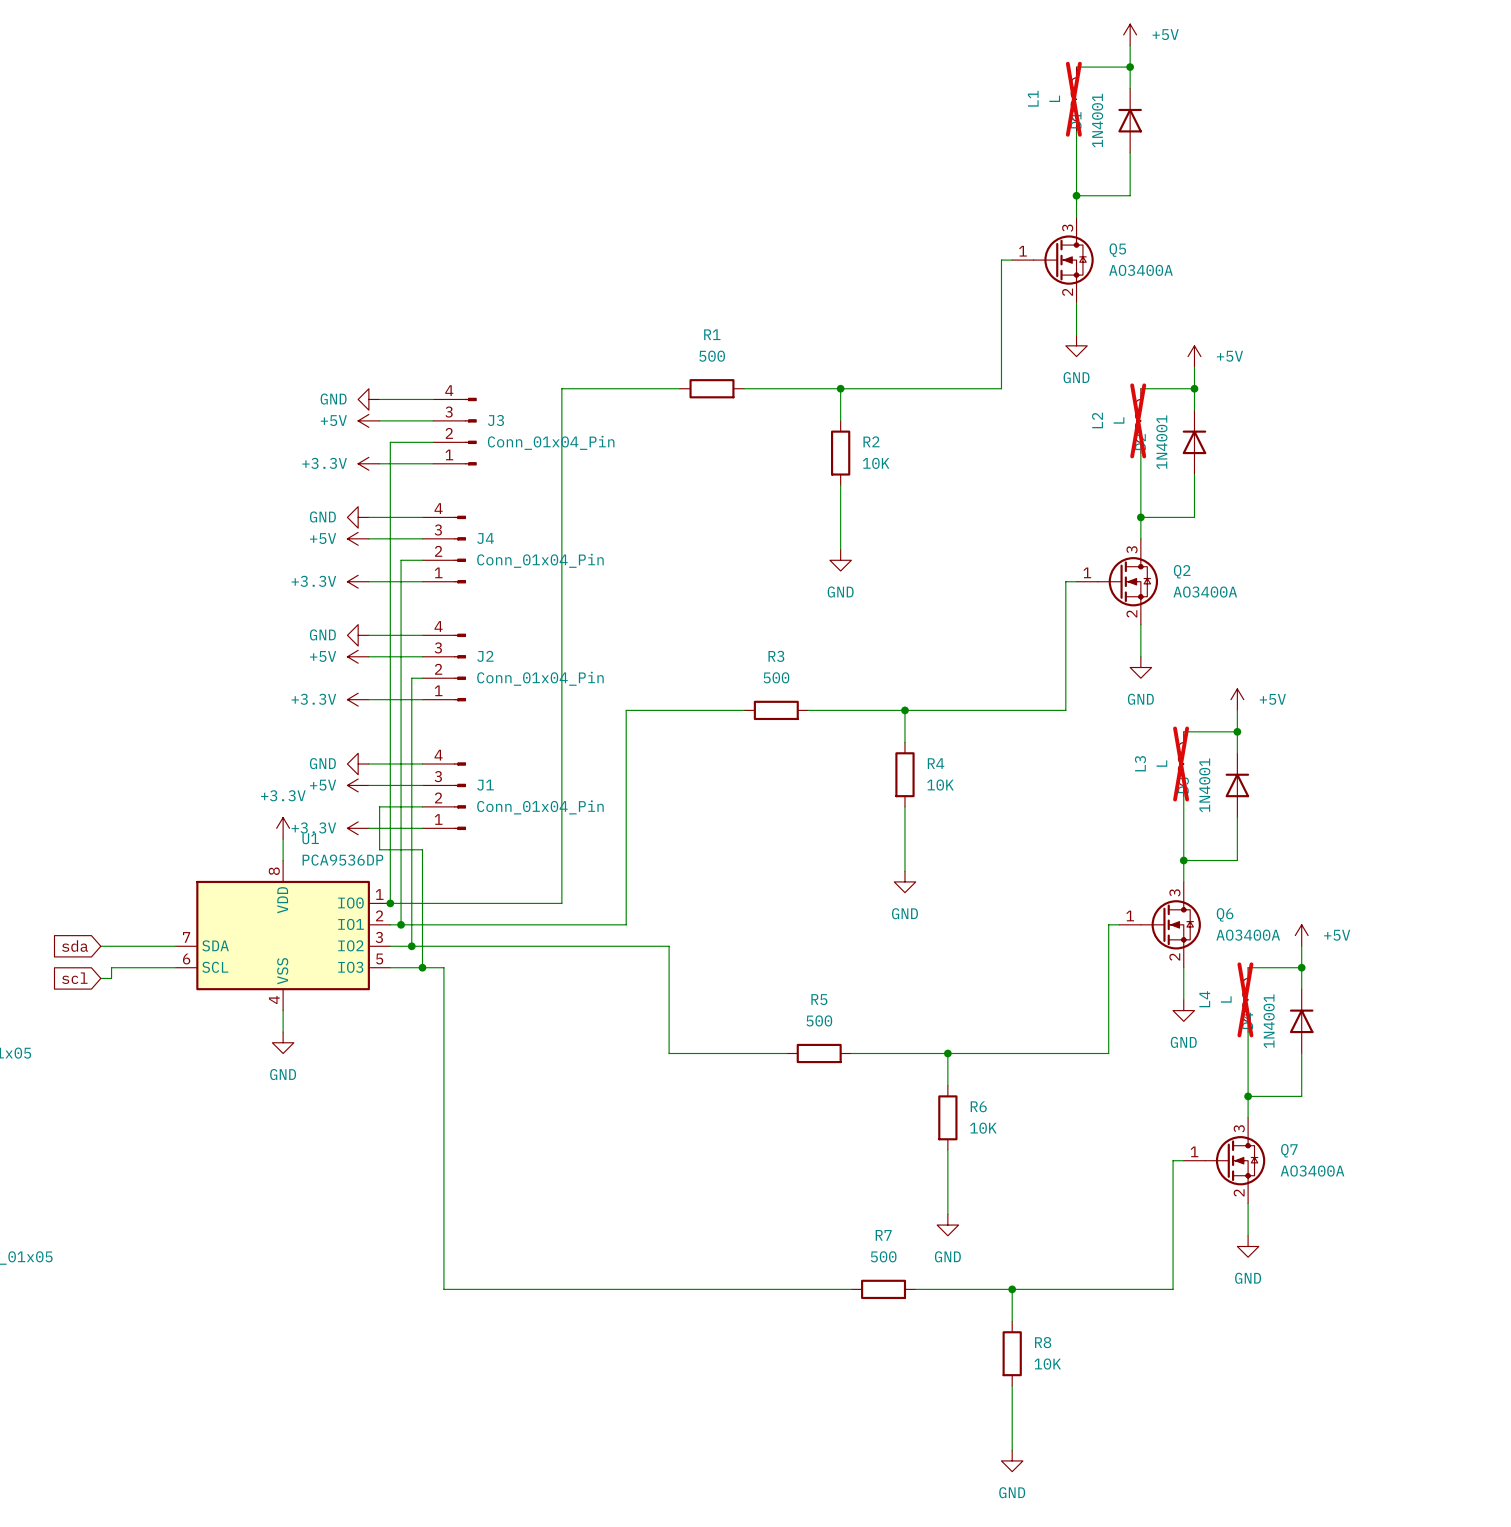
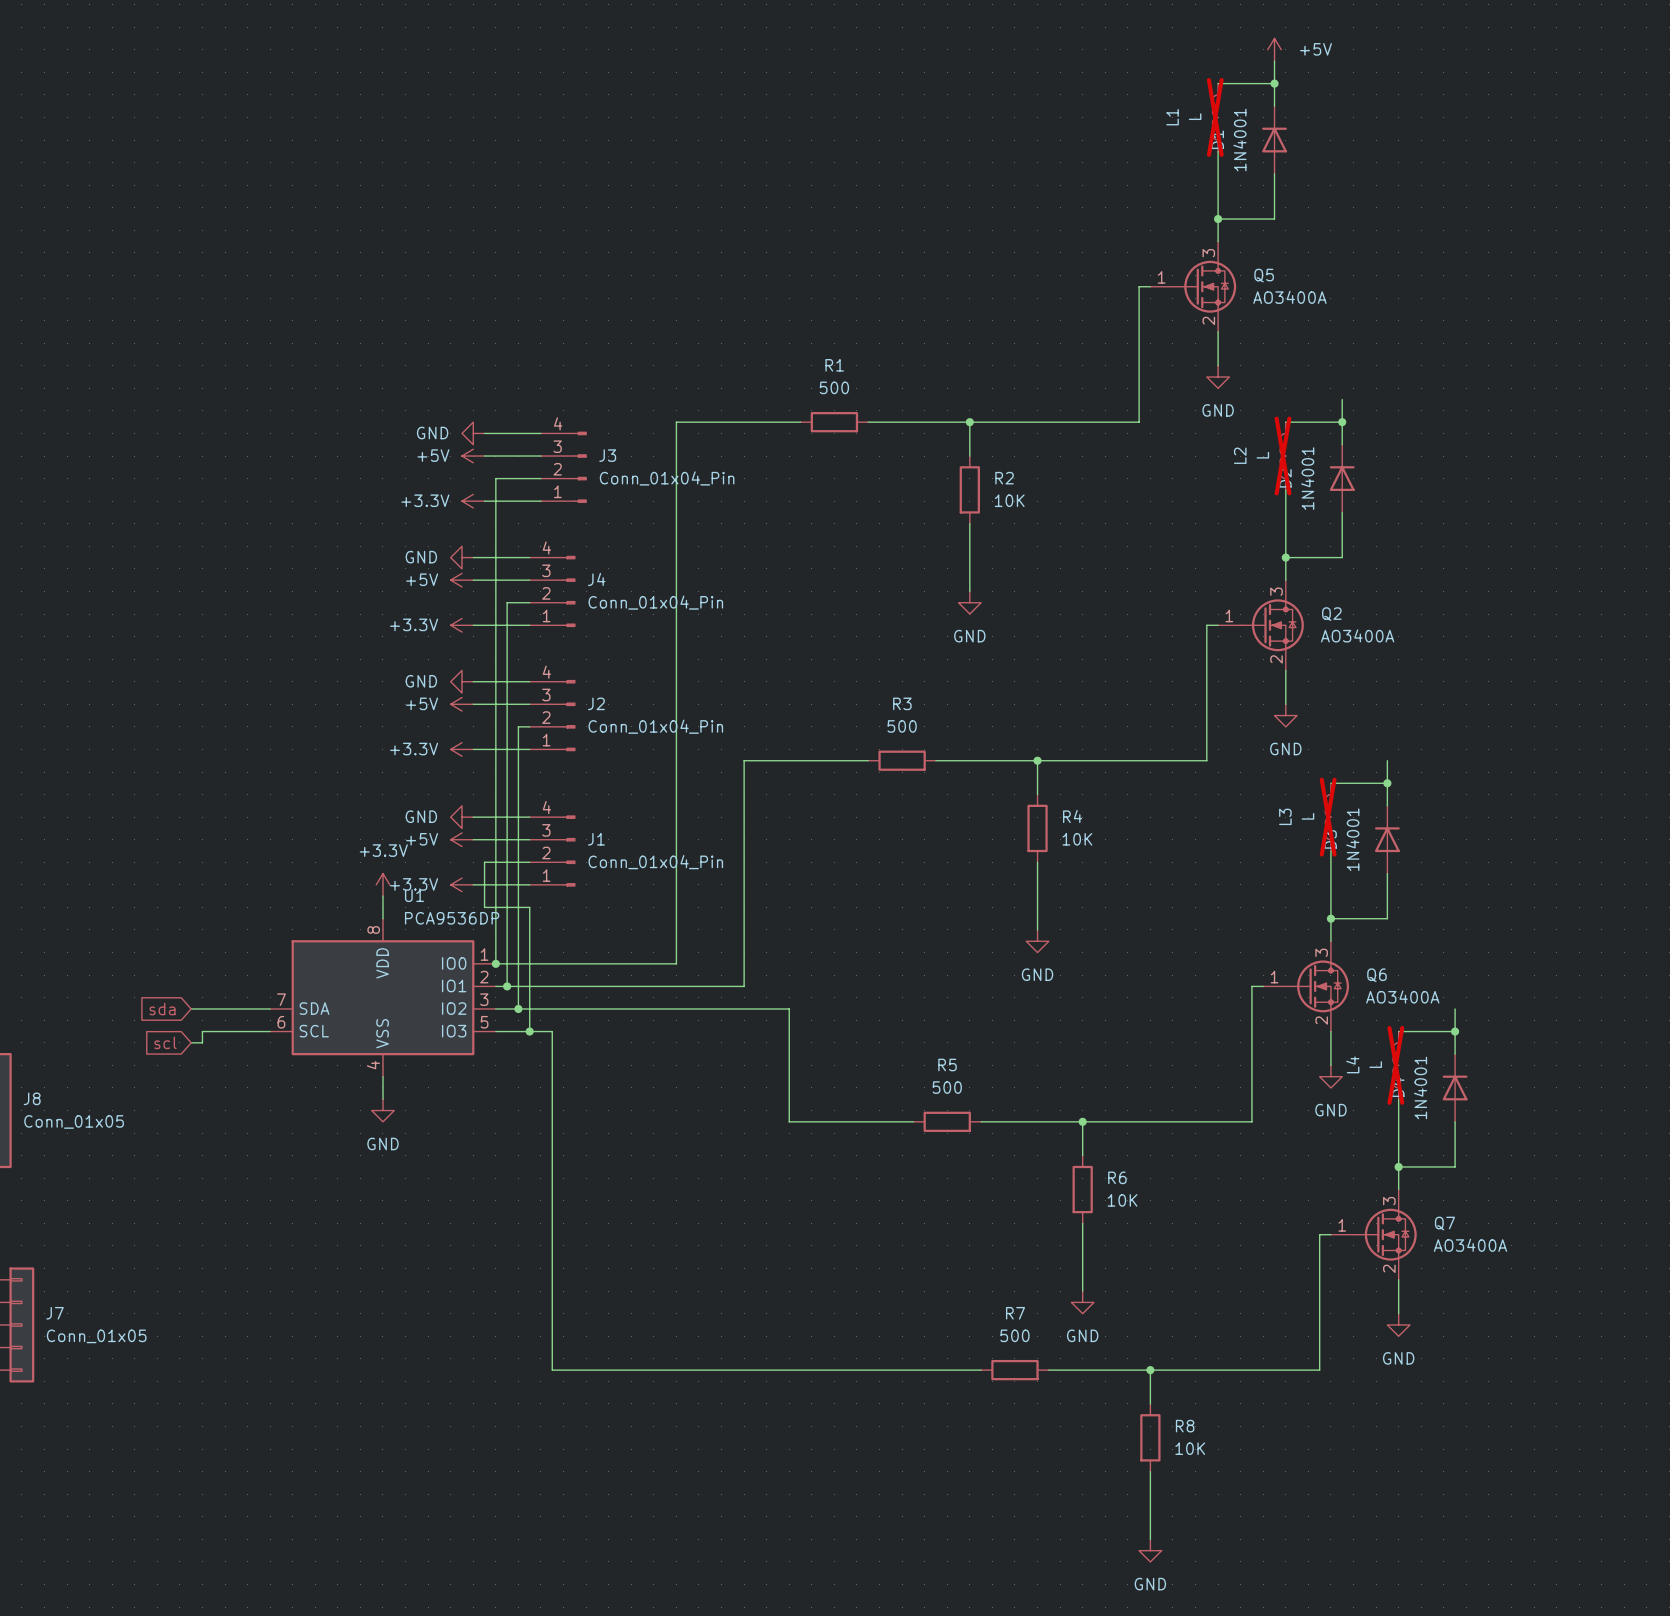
power symbol: +5V (1194, 356) -> none
power symbol: +5V (1237, 699) -> none
power symbol: +5V (1301, 935) -> none

